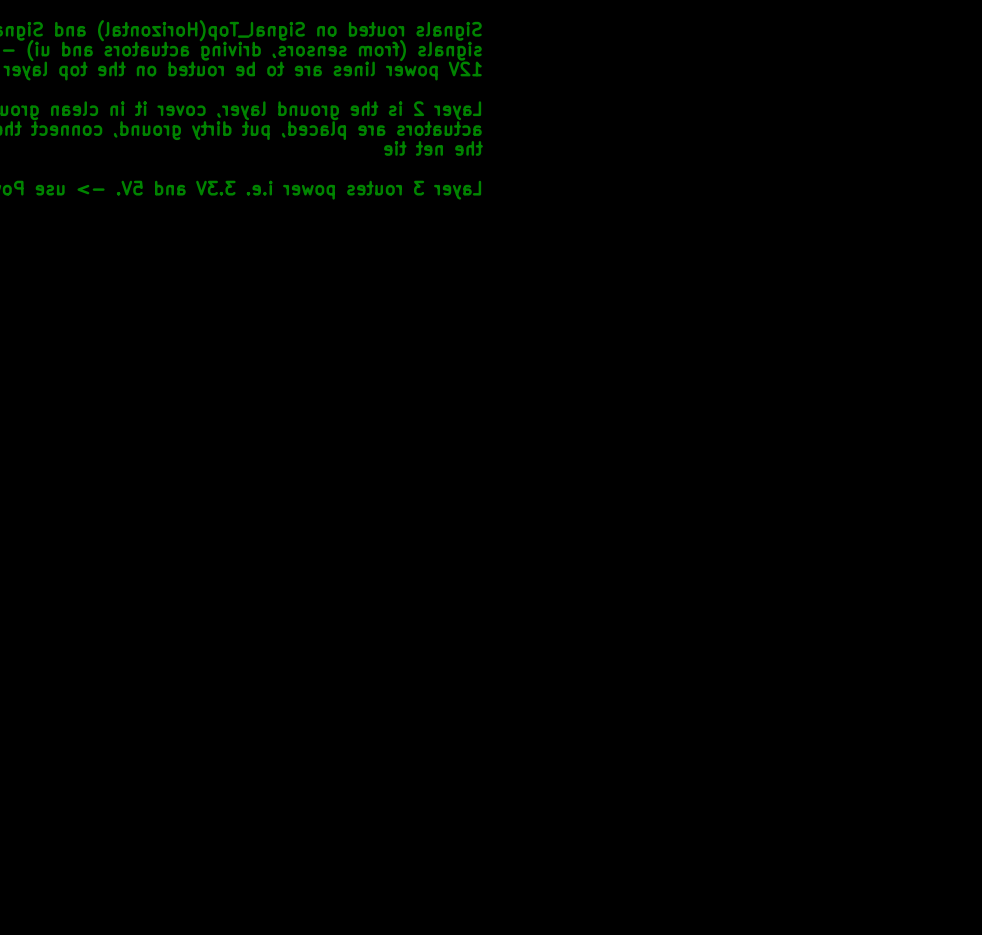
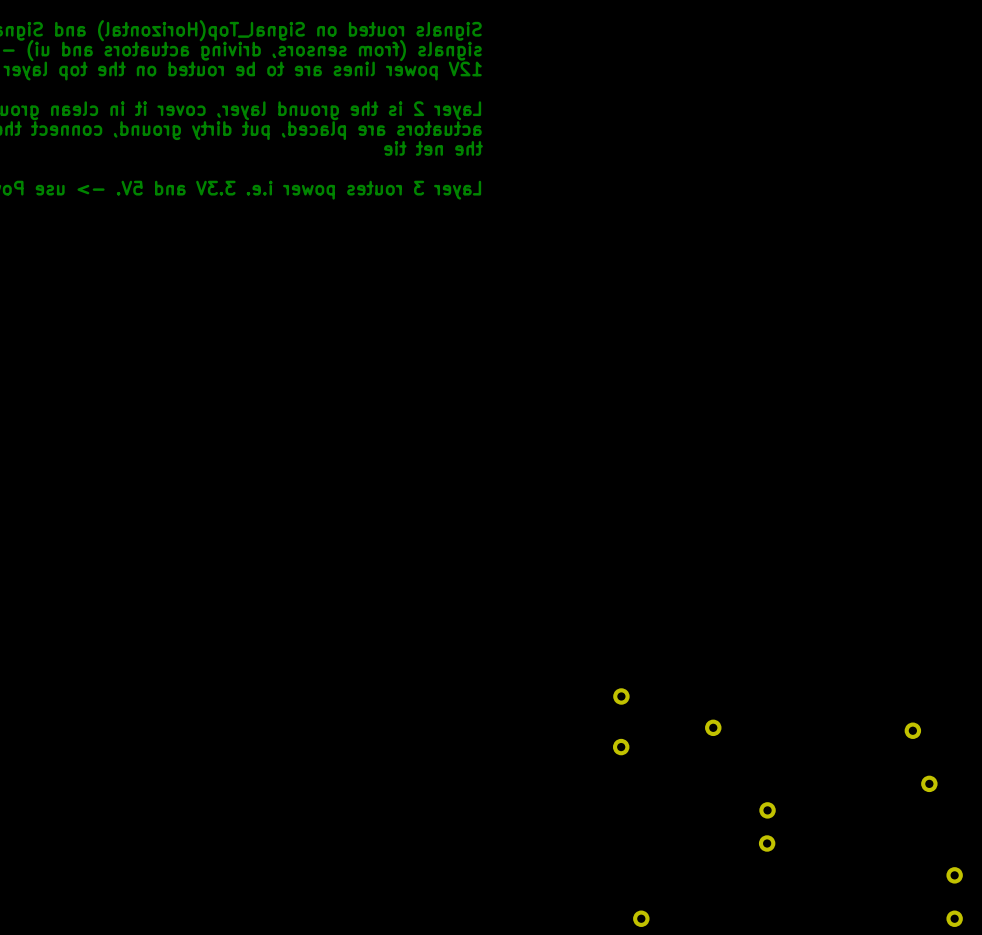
part: none -> (621, 696)
part: none -> (713, 727)
part: none -> (912, 730)
part: none -> (621, 747)
part: none -> (929, 783)
part: none -> (767, 810)
part: none -> (767, 843)
part: none -> (954, 875)
part: none -> (641, 918)
part: none -> (954, 918)

